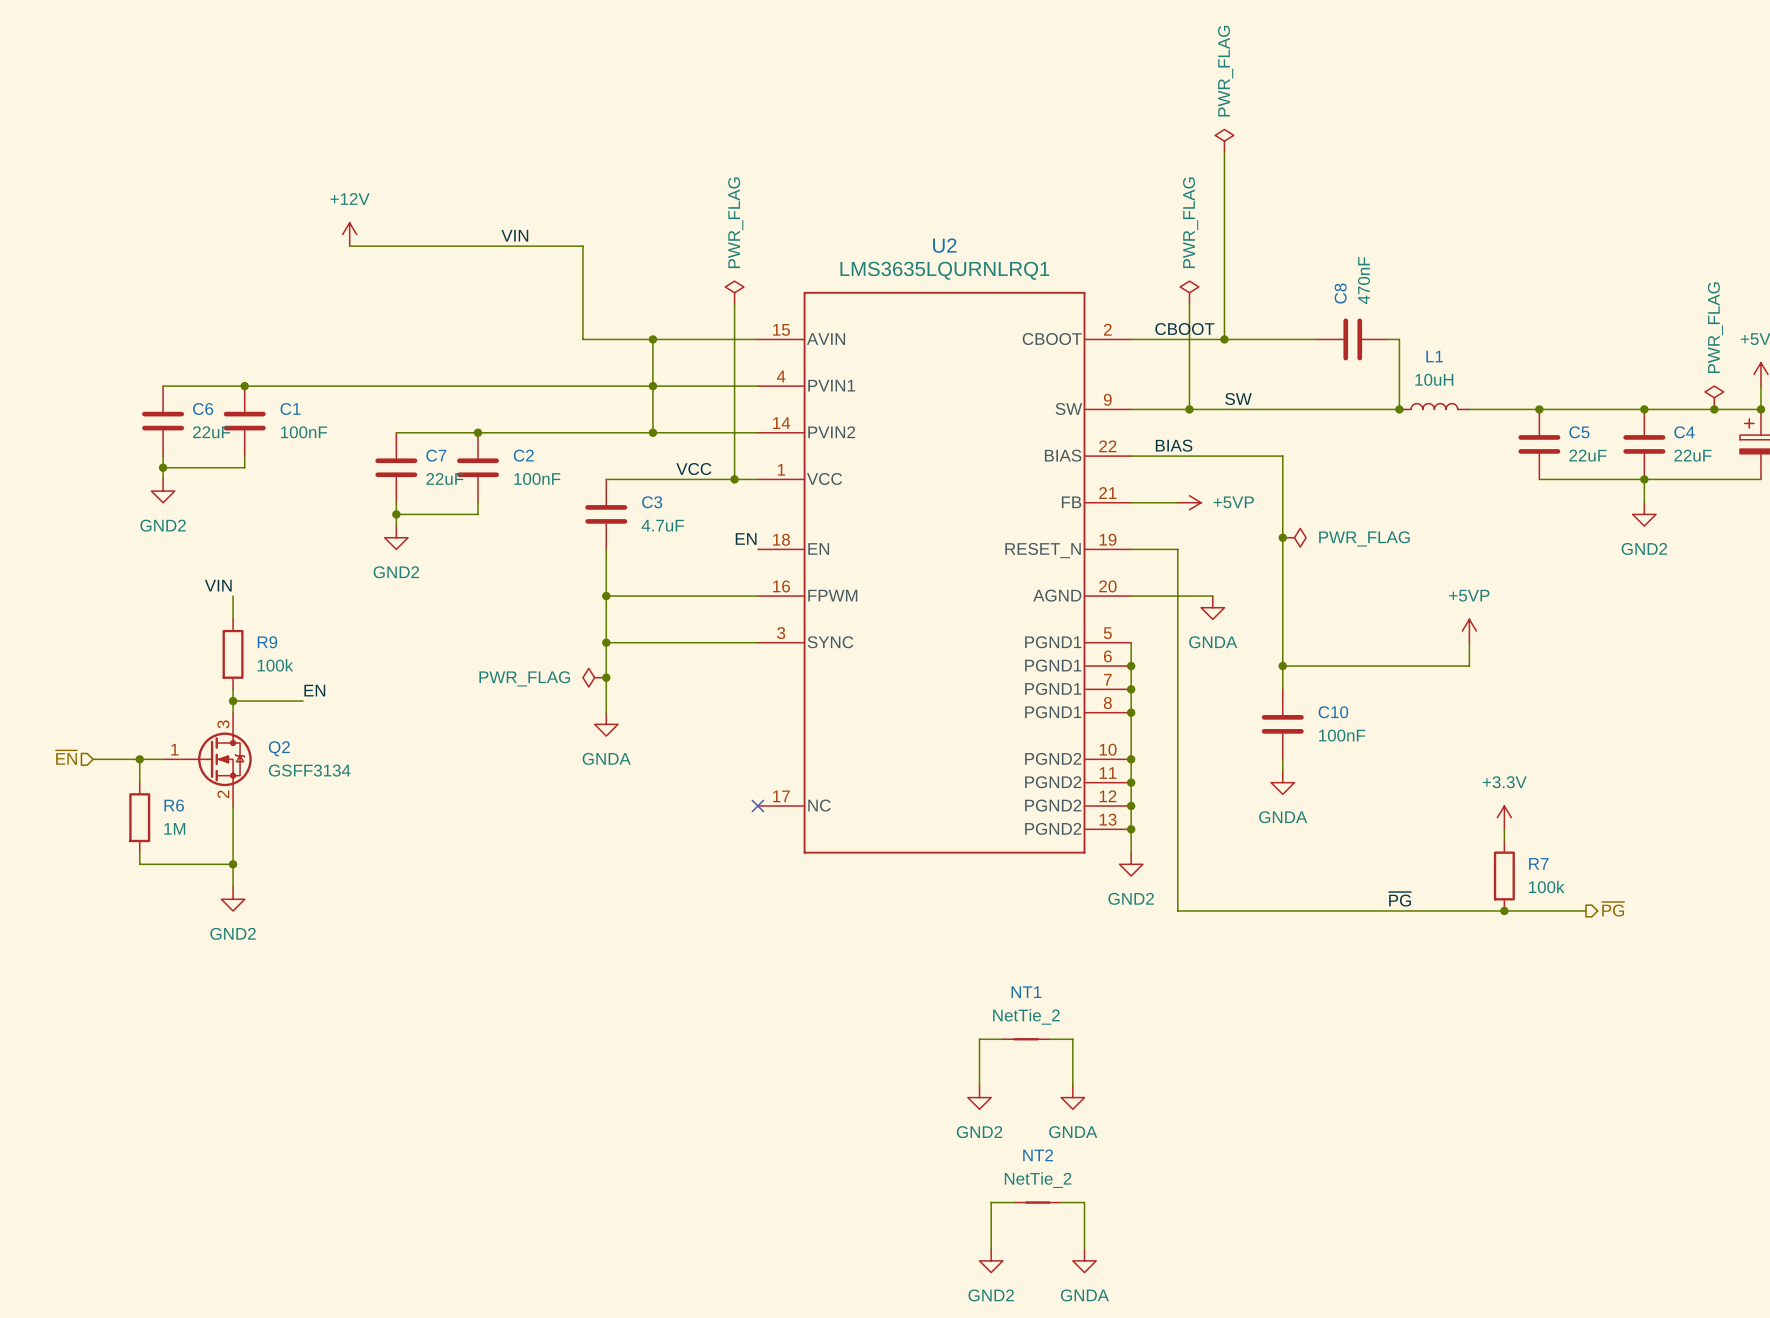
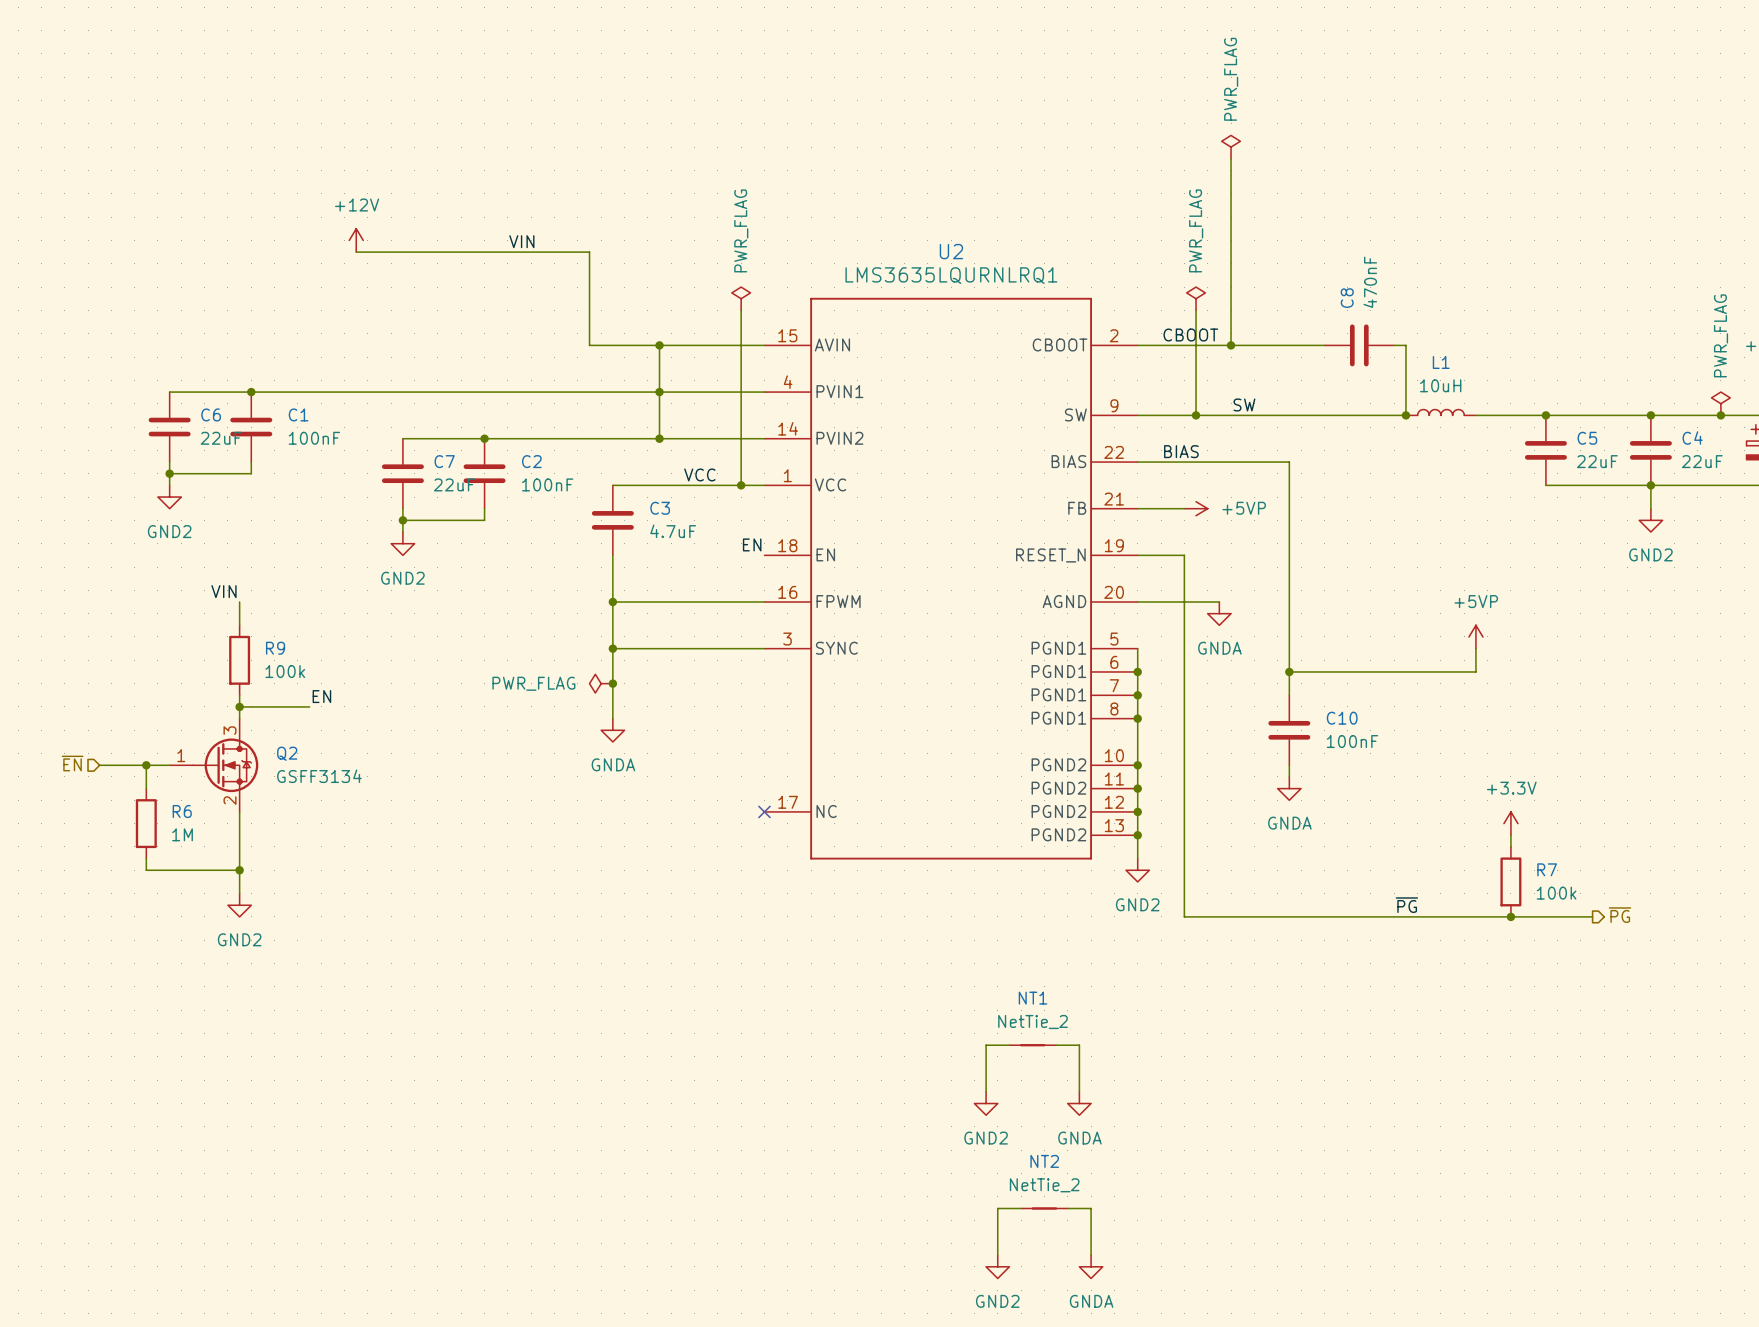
junction: (1282, 537) -> none
power symbol: PWR_FLAG (1294, 537) -> none

